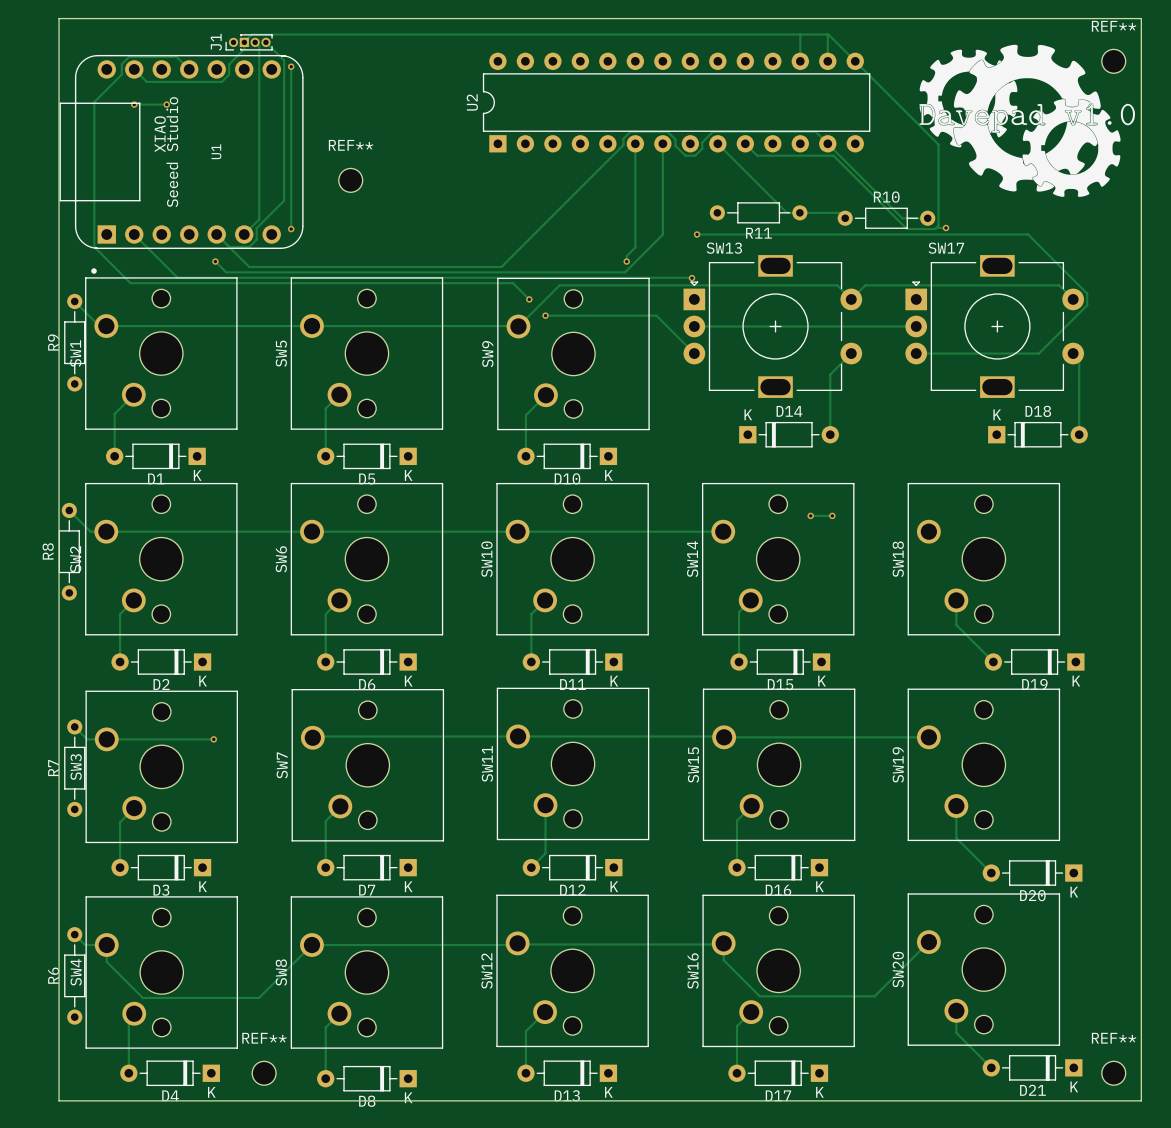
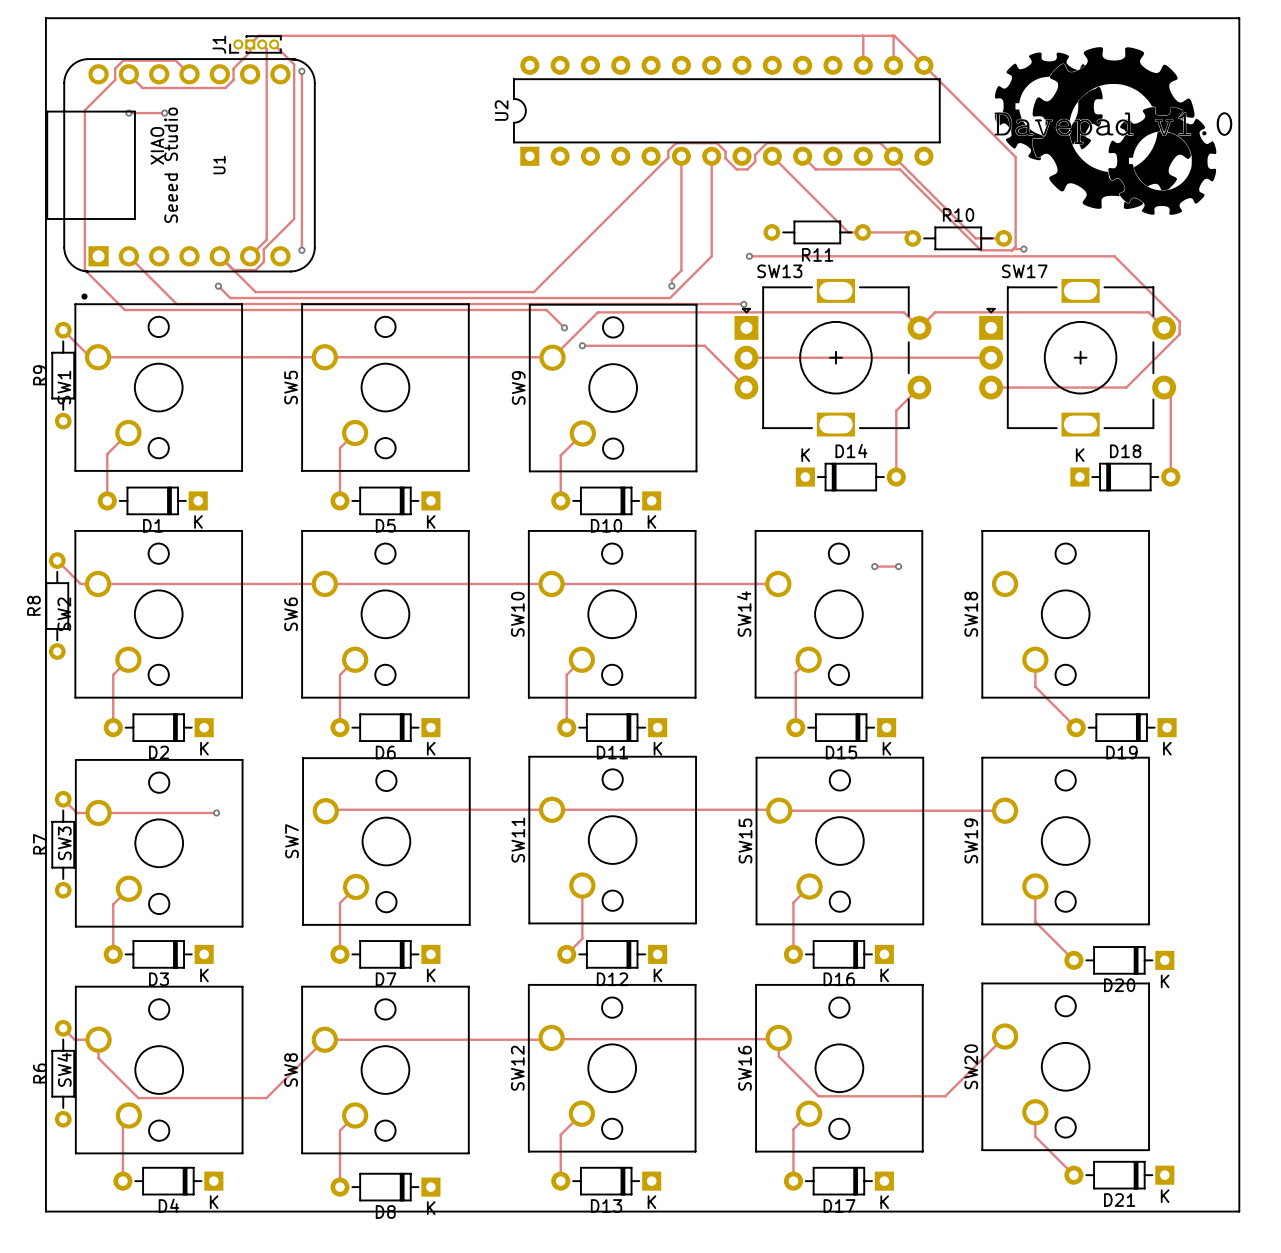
REF**: (1113, 61) -> none
REF**: (350, 180) -> none
REF**: (264, 1073) -> none
REF**: (1113, 1073) -> none

